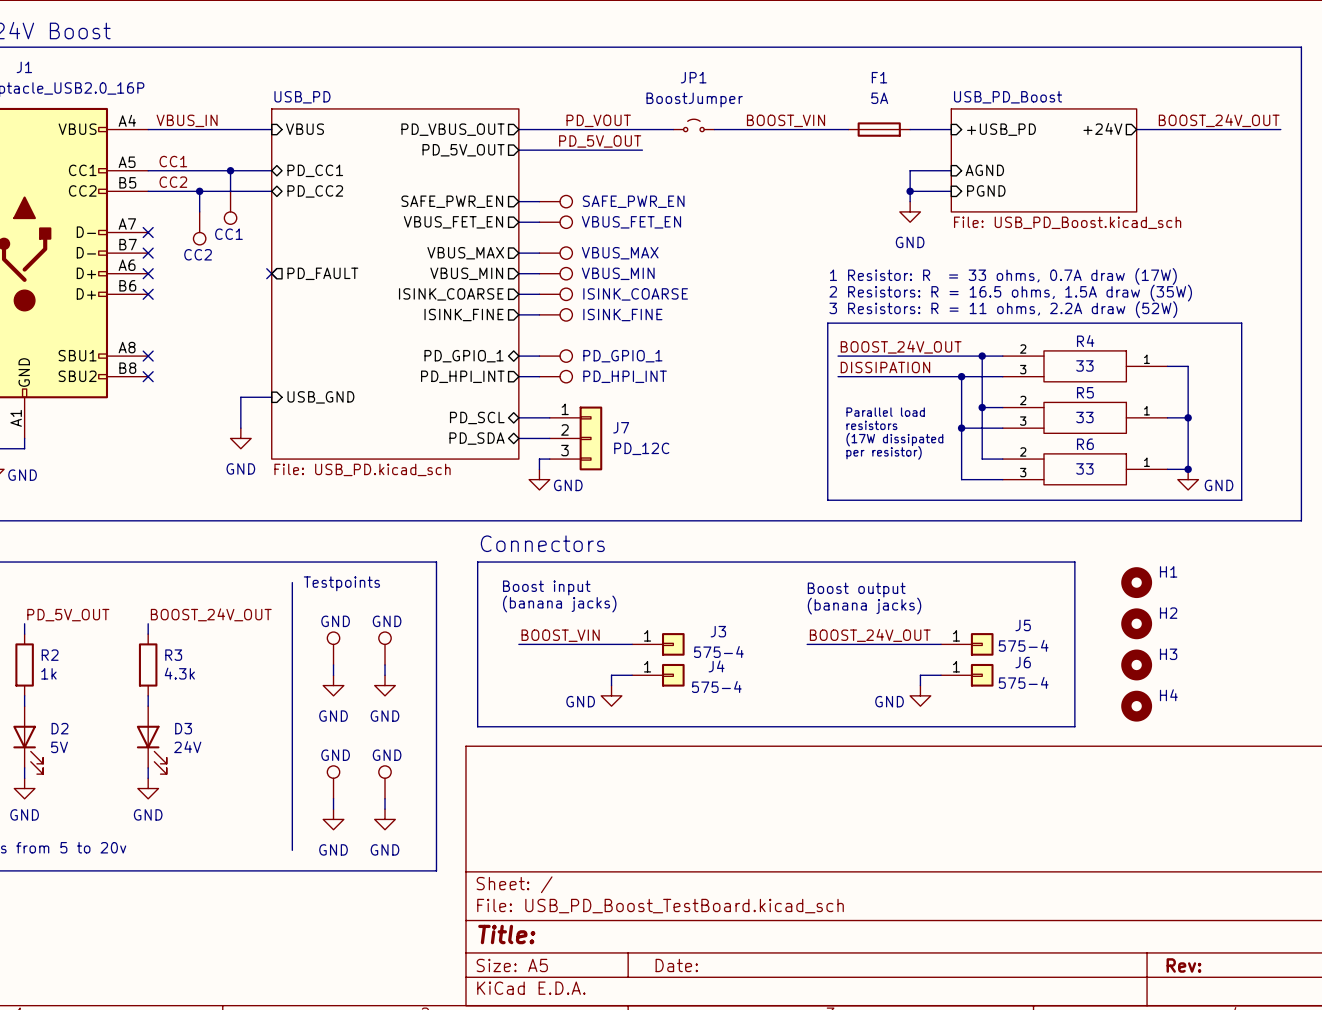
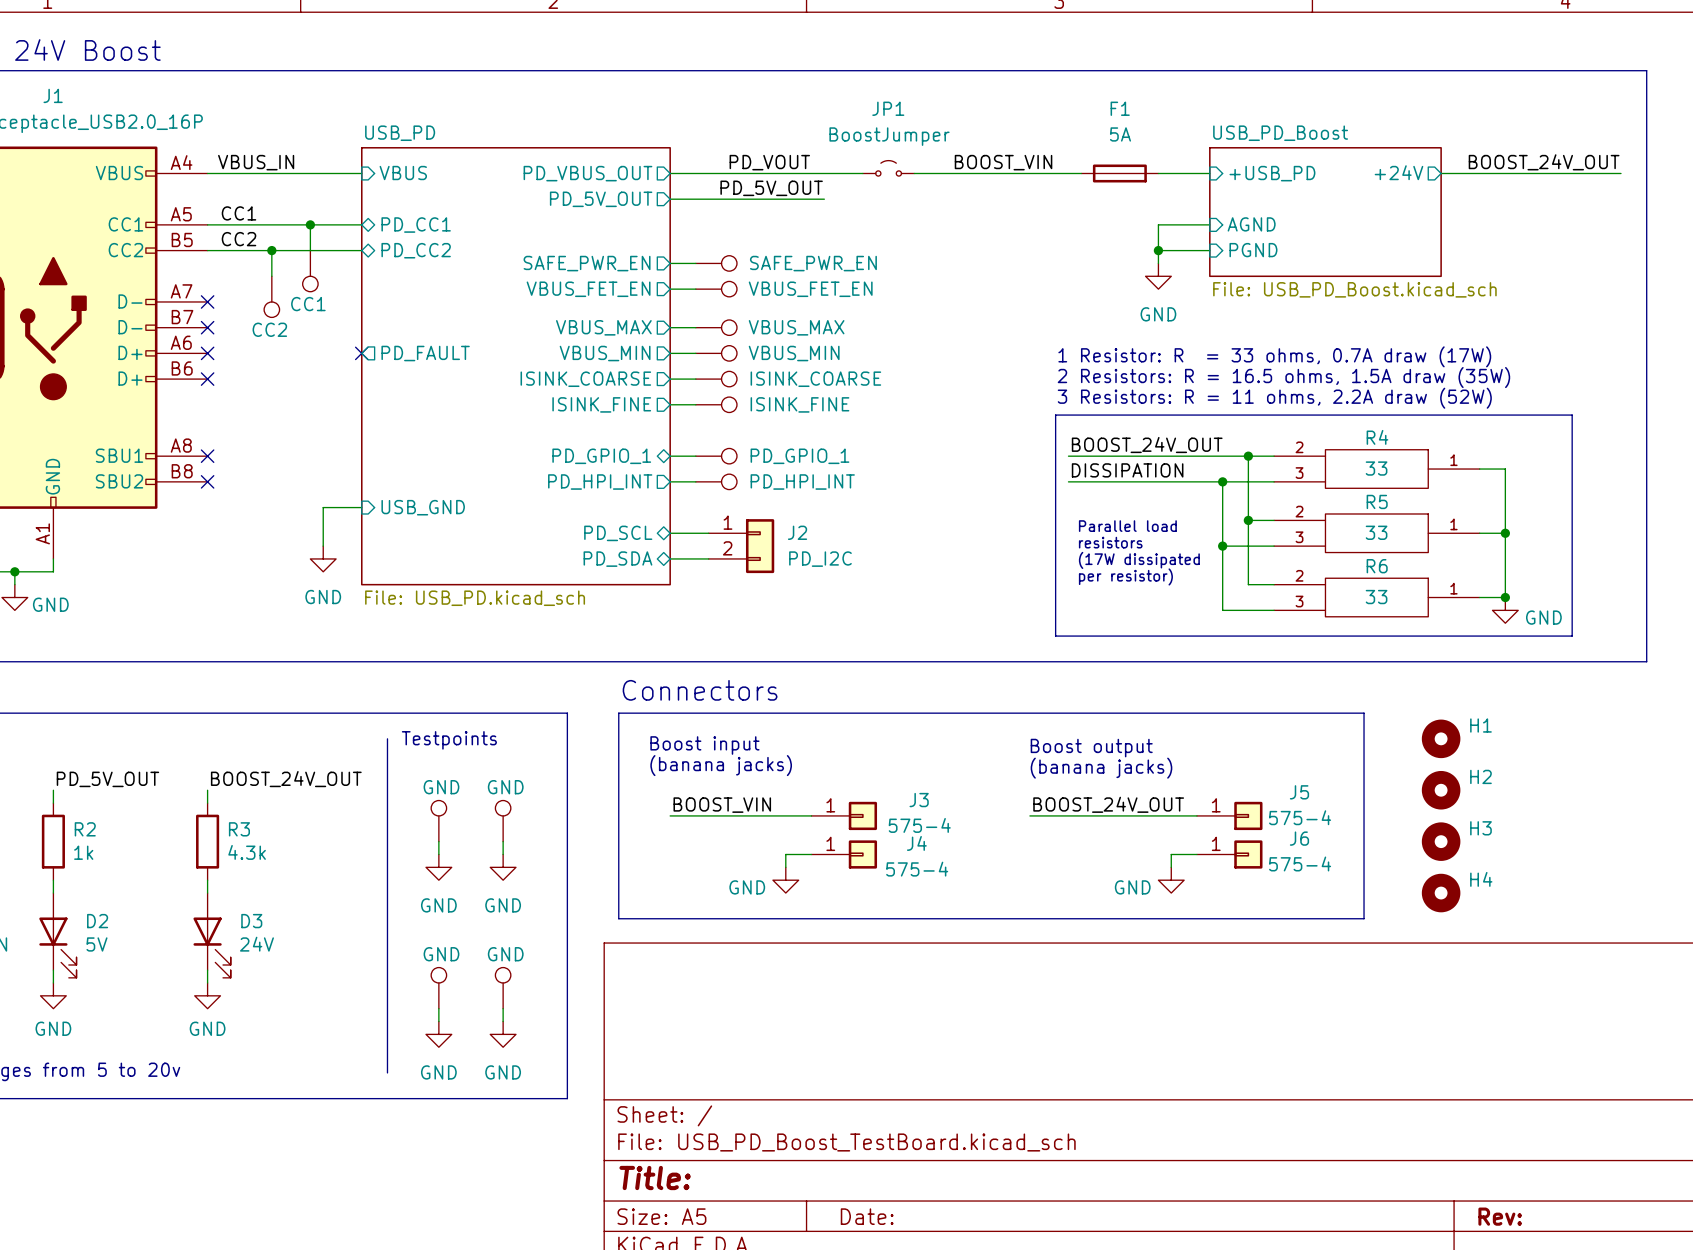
J2: none -> PD_I2C (741, 546)
J7: PD_12C (576, 438) -> none
wire: (549, 459) (539, 459) (539, 469) -> none
power symbol: GND (539, 479) -> none

